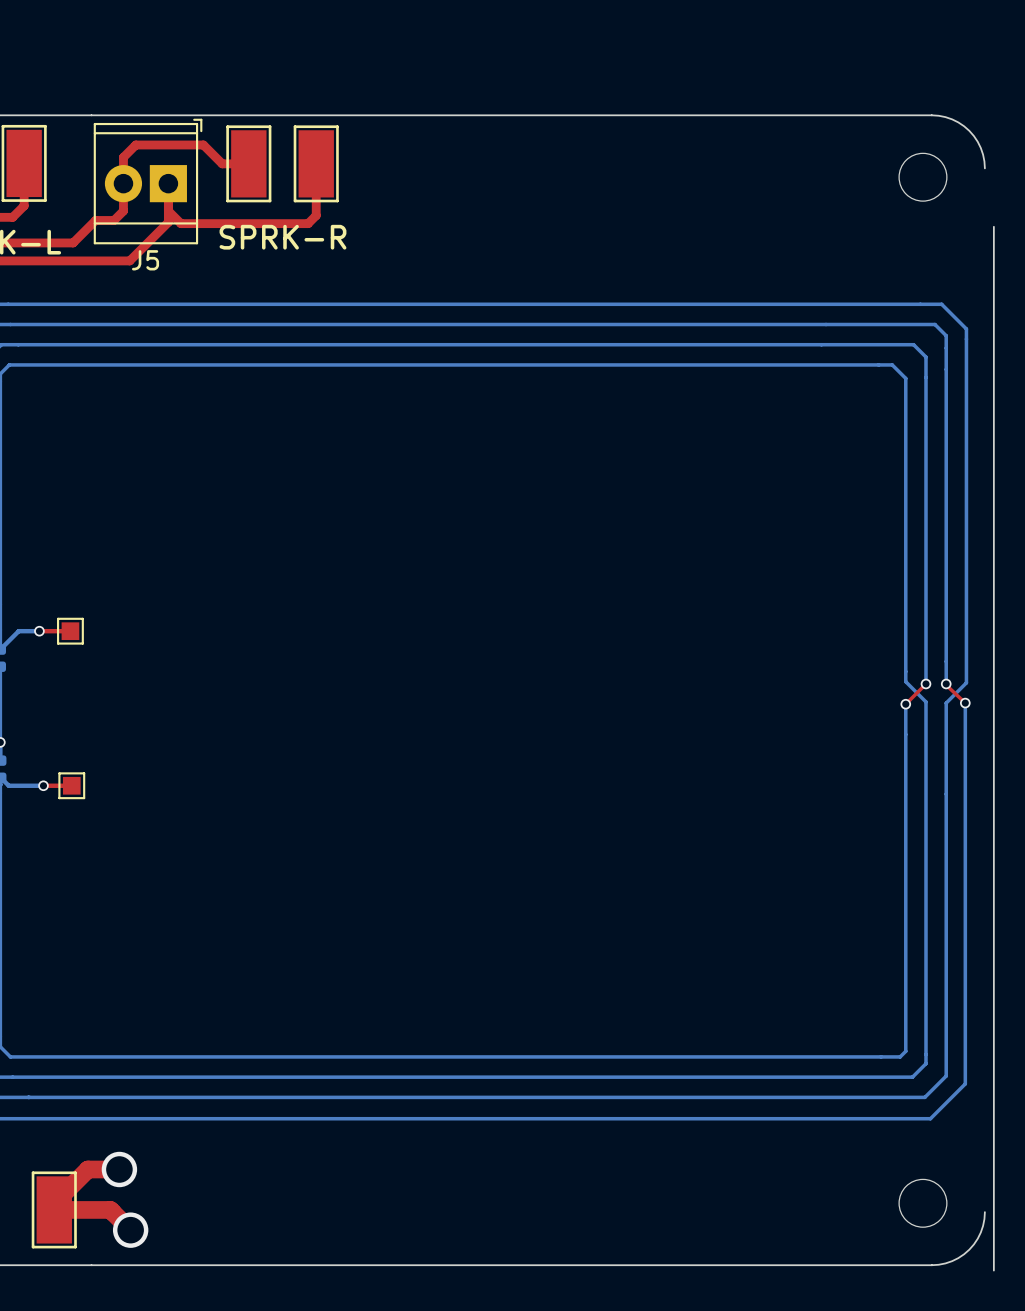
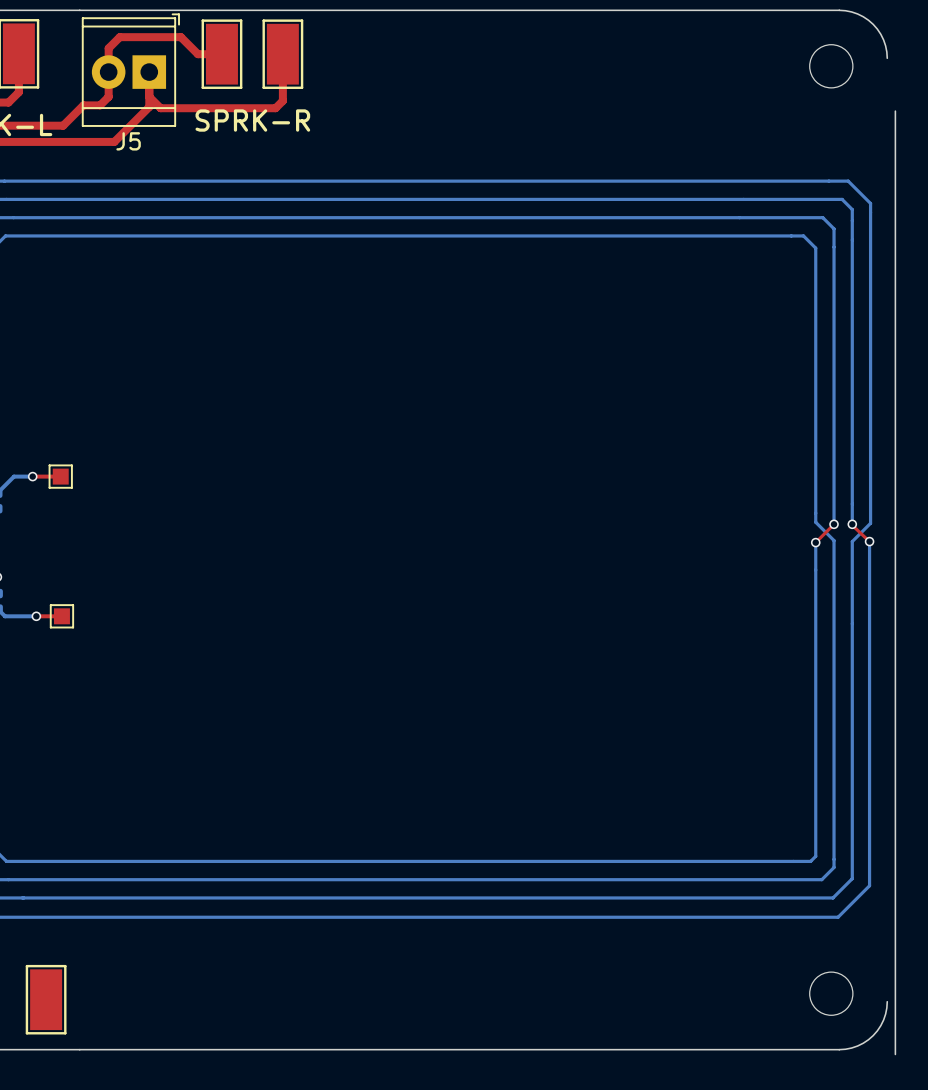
top track: (119, 1169) (87, 1169) (54, 1203) (54, 1209) (110, 1209) (130, 1230) -> none
via: (119, 1169) -> none
via: (130, 1230) -> none

